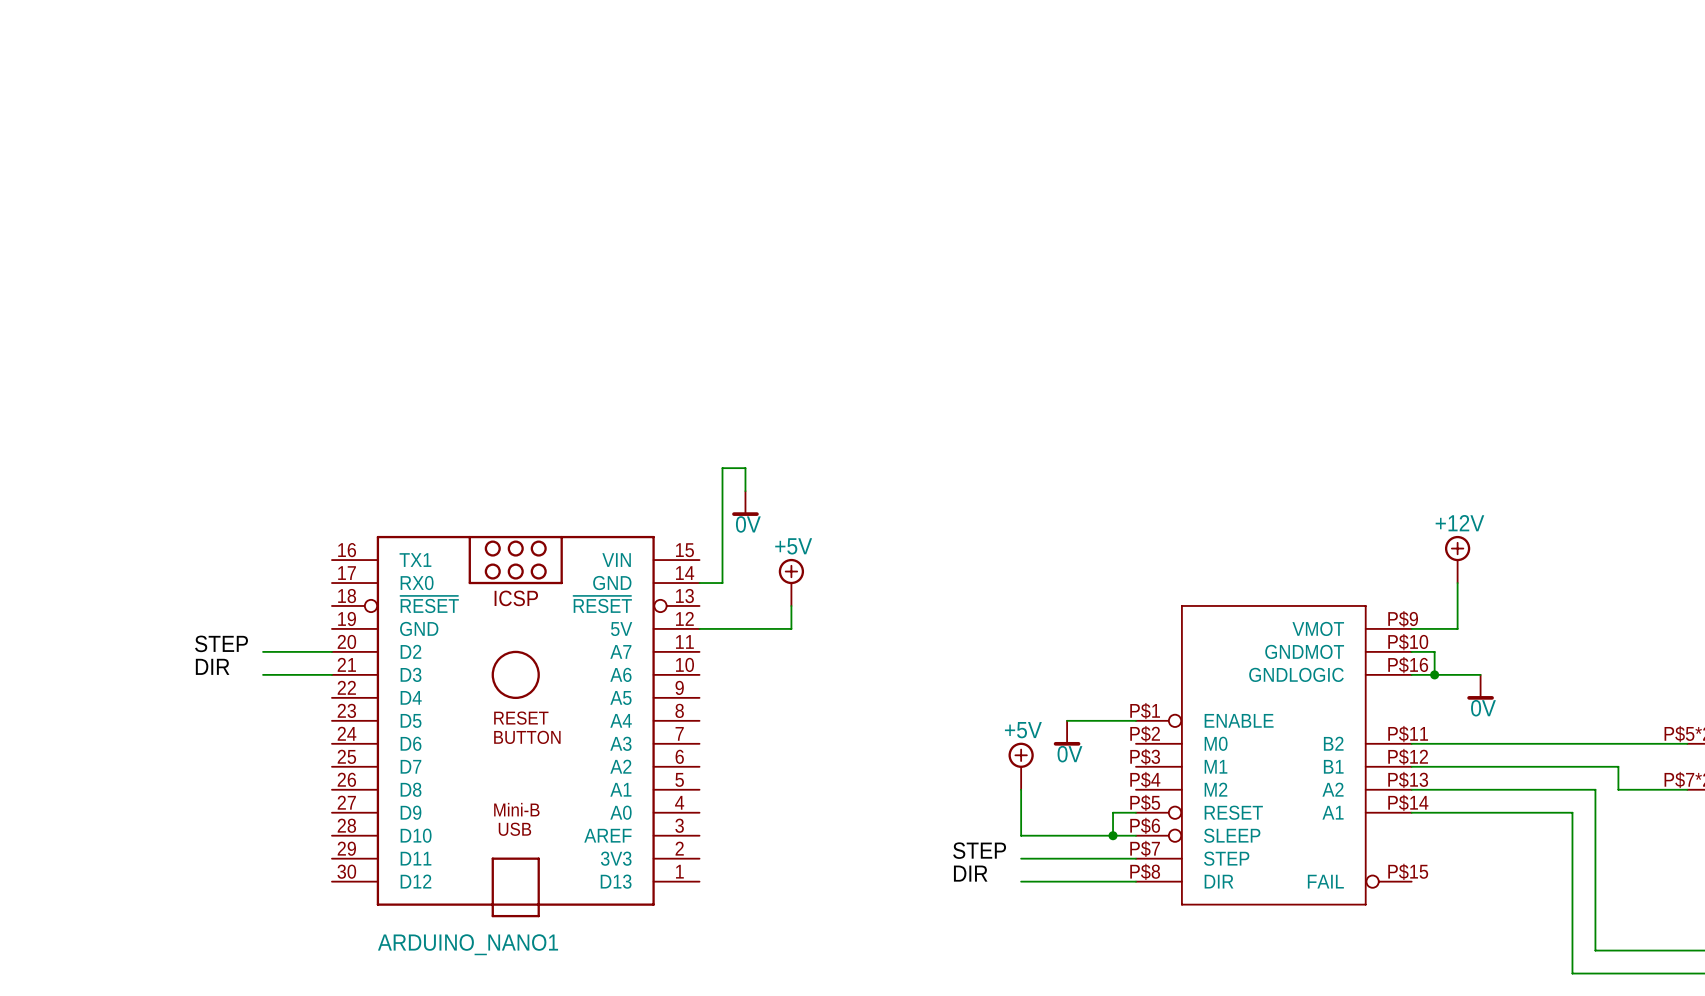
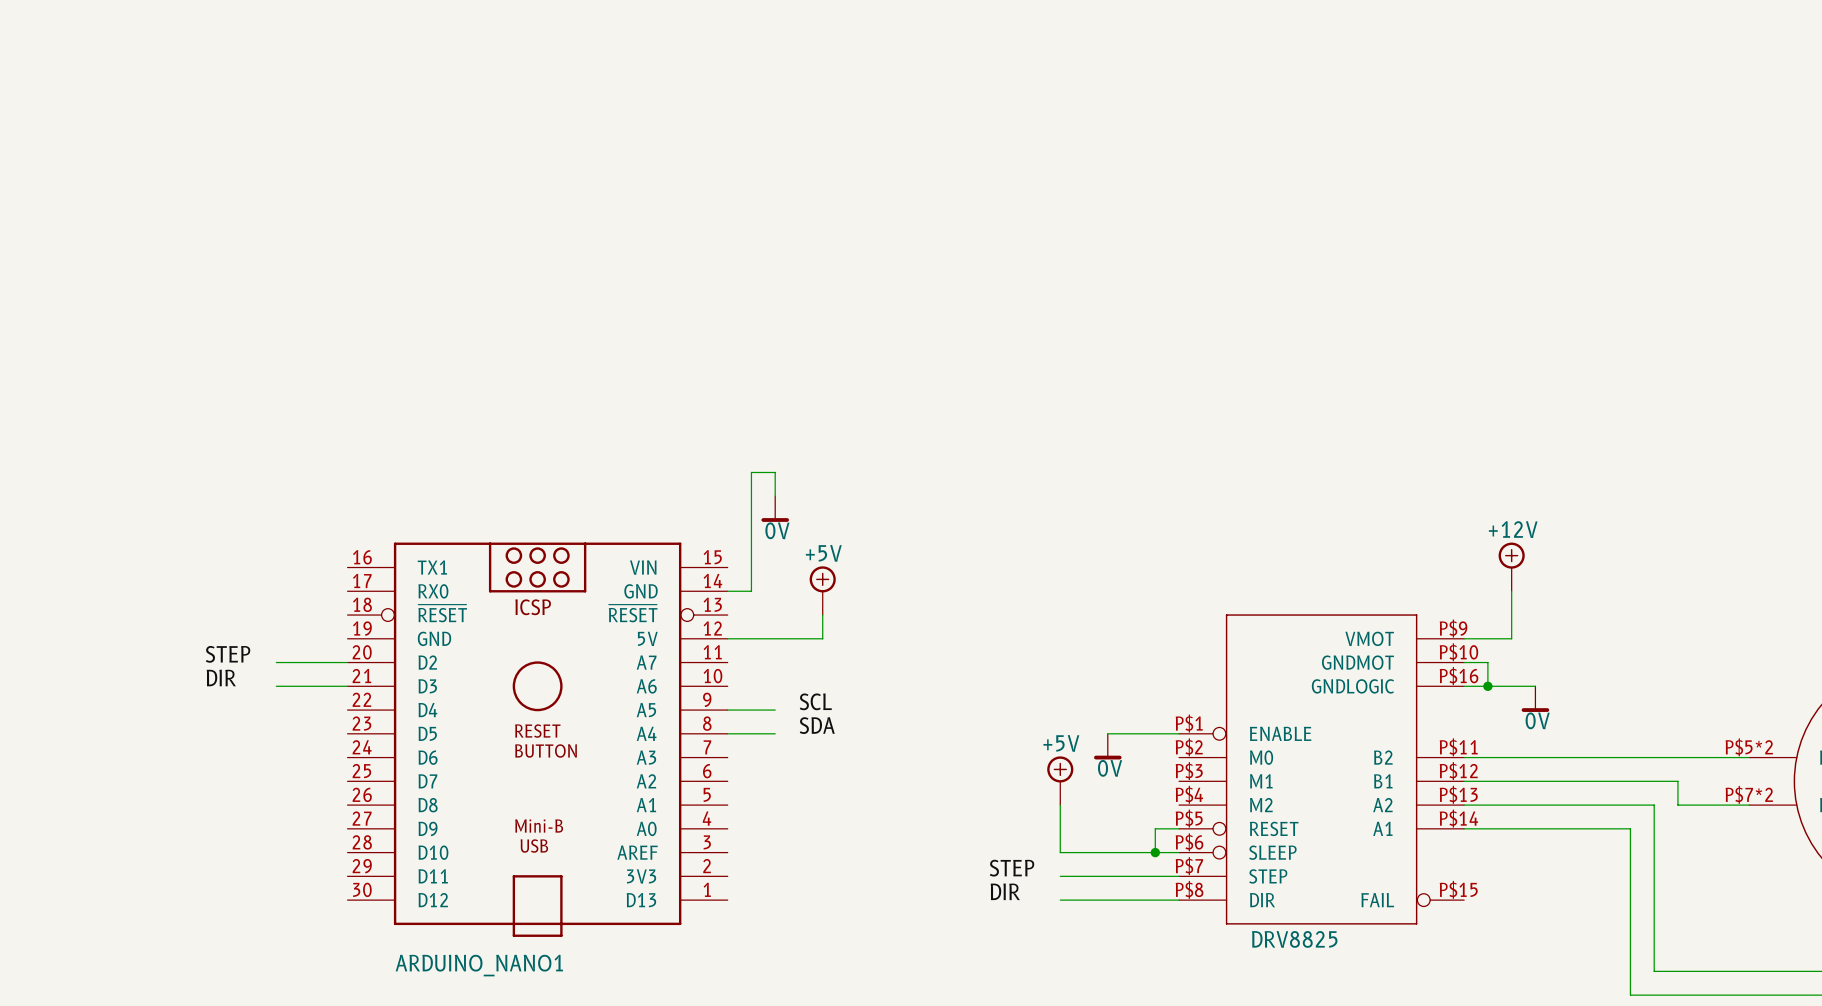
label: none -> SCL (815, 701)
wire: none -> (727, 710) (775, 710)
label: none -> SDA (817, 725)
wire: none -> (727, 733) (775, 733)
DRV8825 name: none -> DRV8825 (1294, 939)

